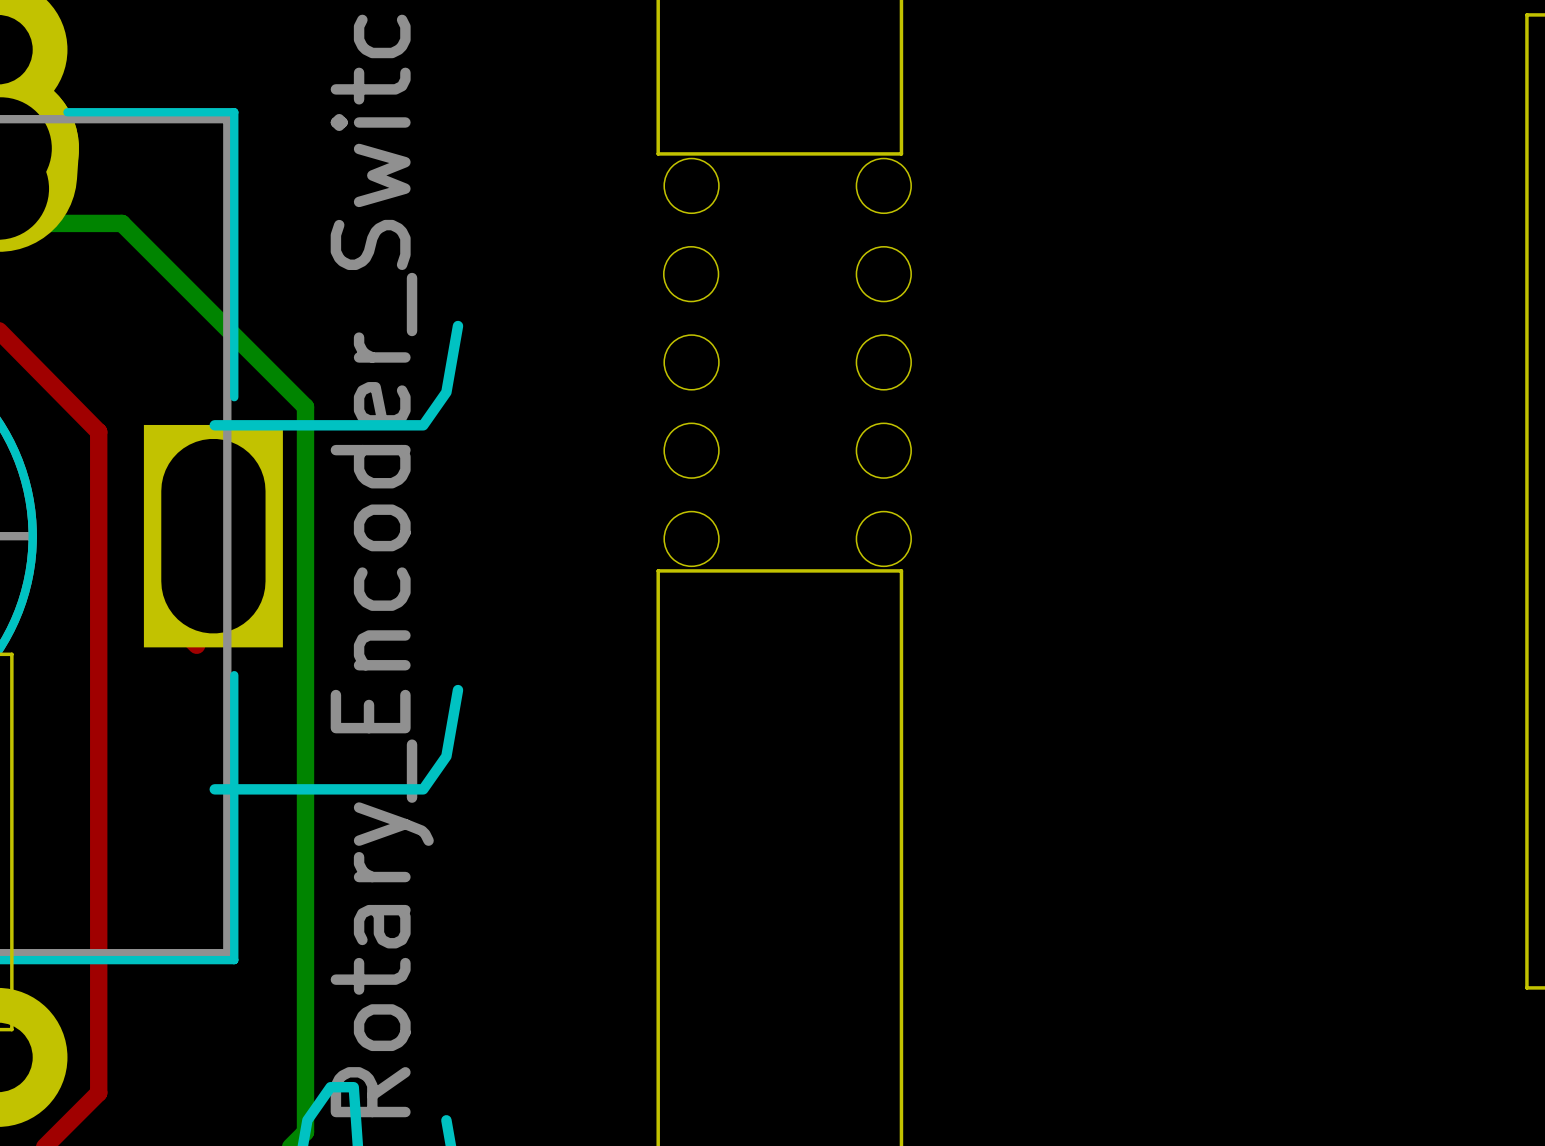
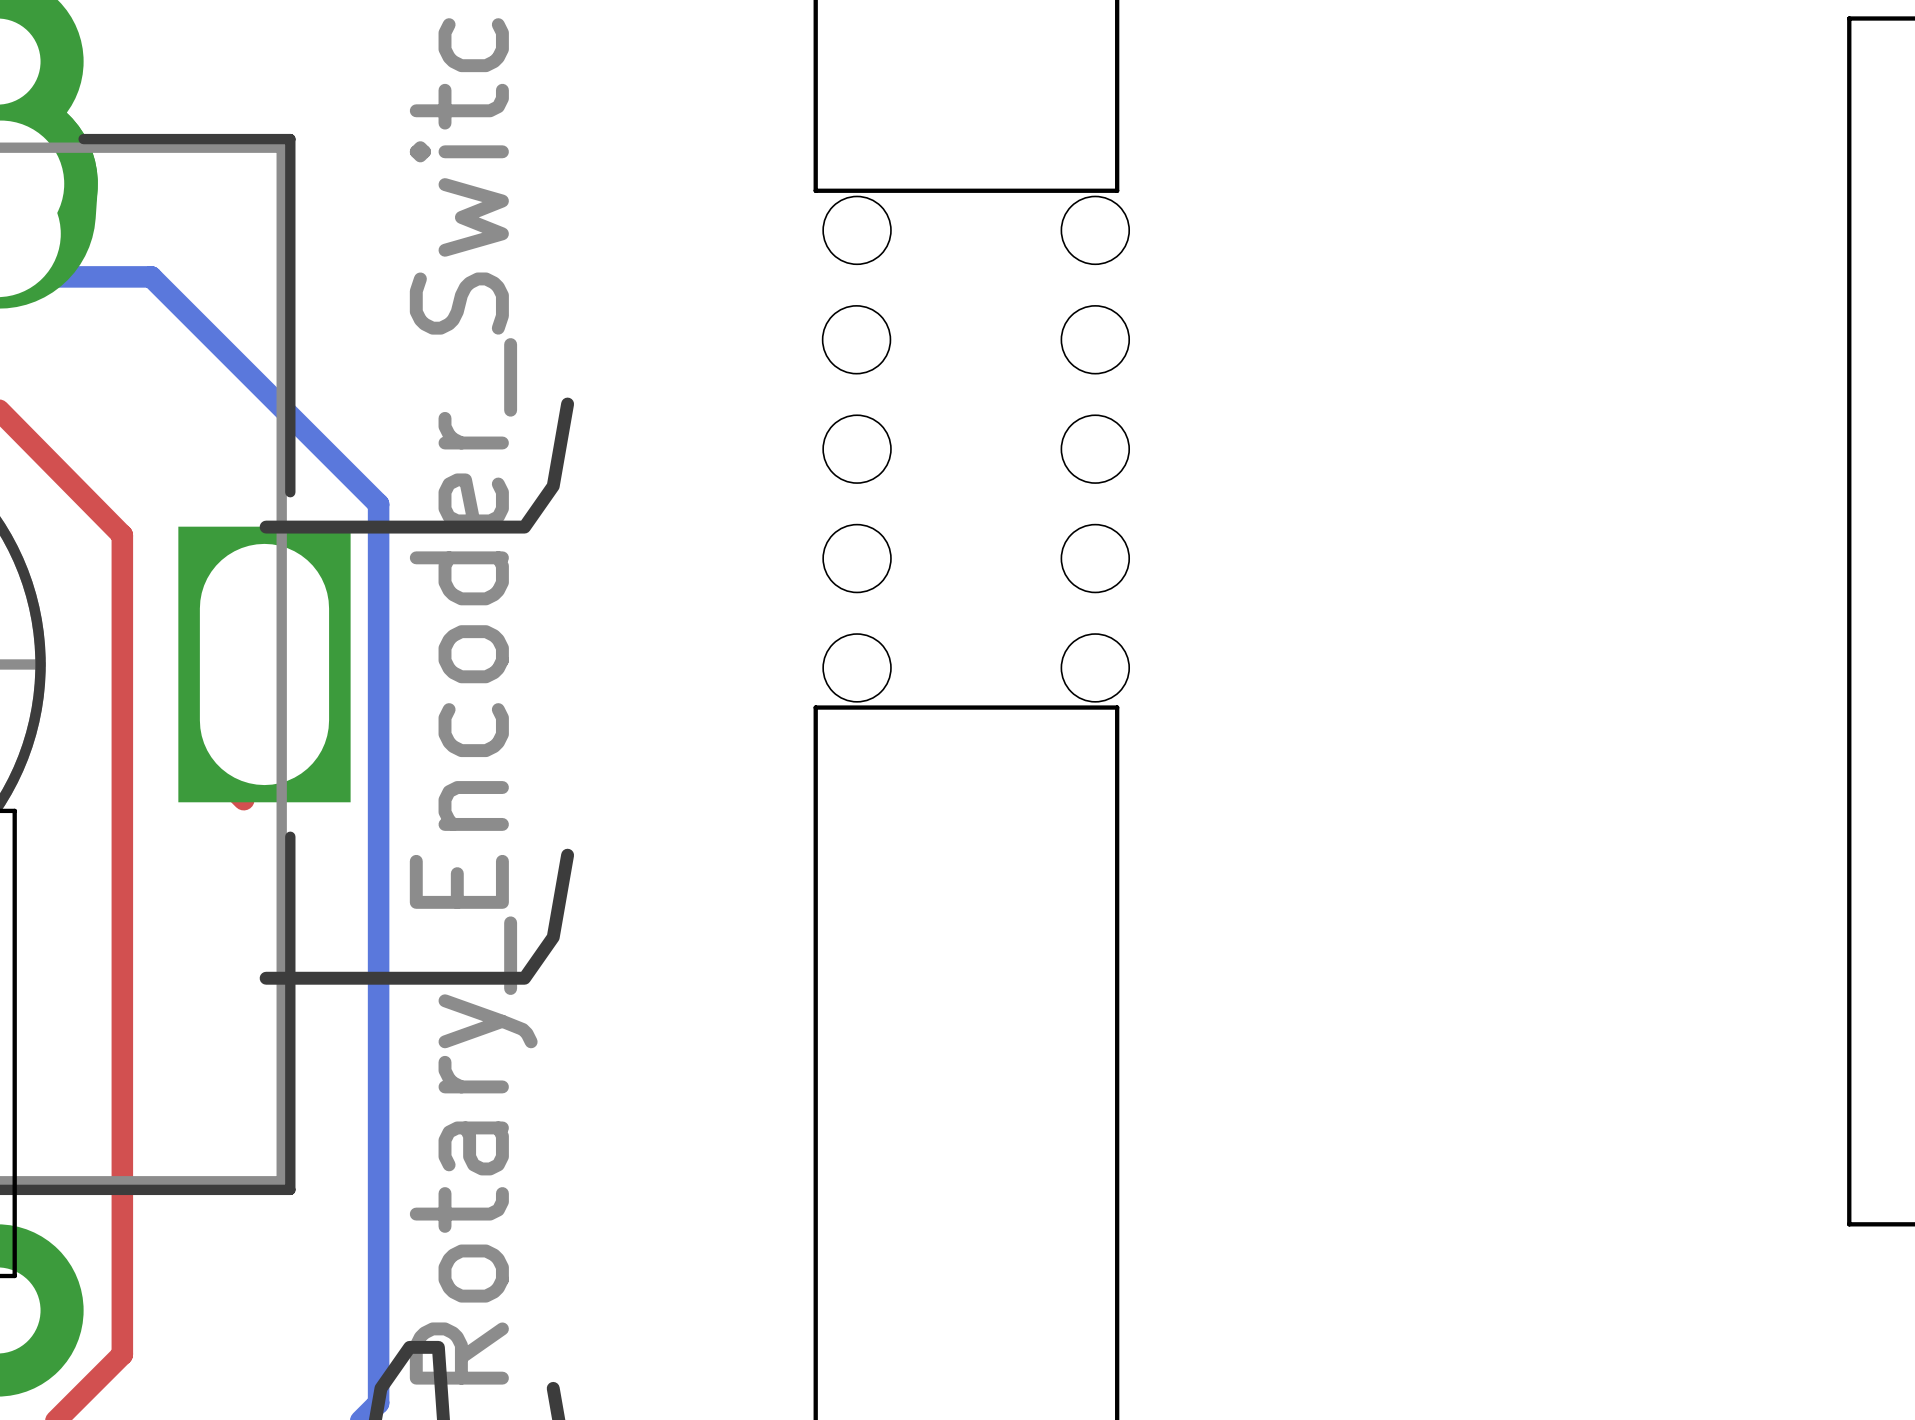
board edge: (1526, 14) (1526, 987) -> (1892, 18) (1849, 18) (1849, 1224) (1892, 1224)

